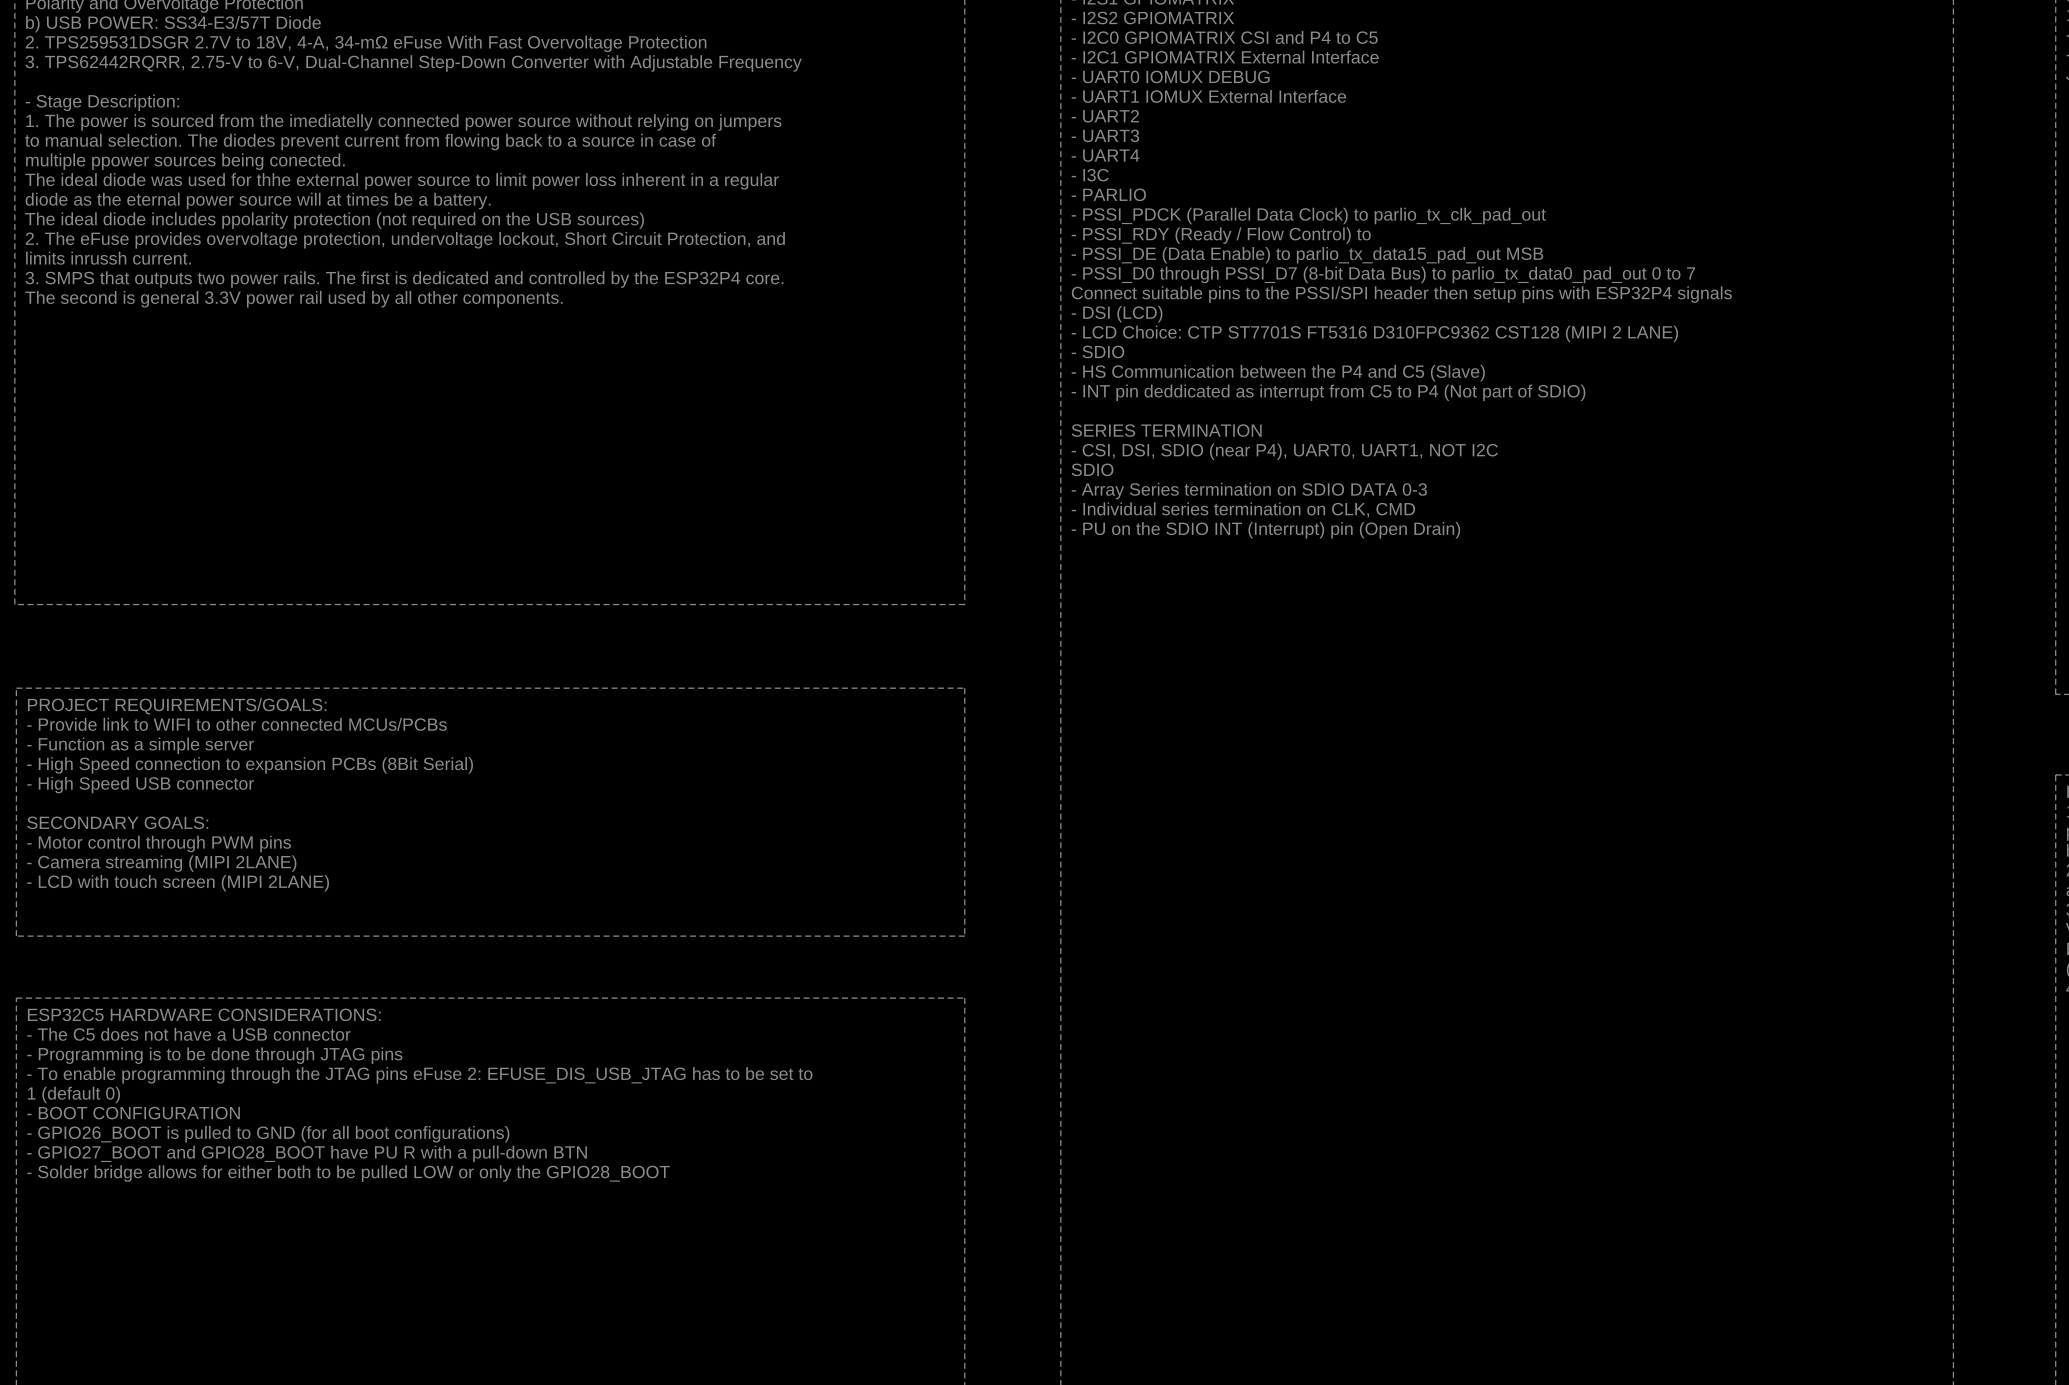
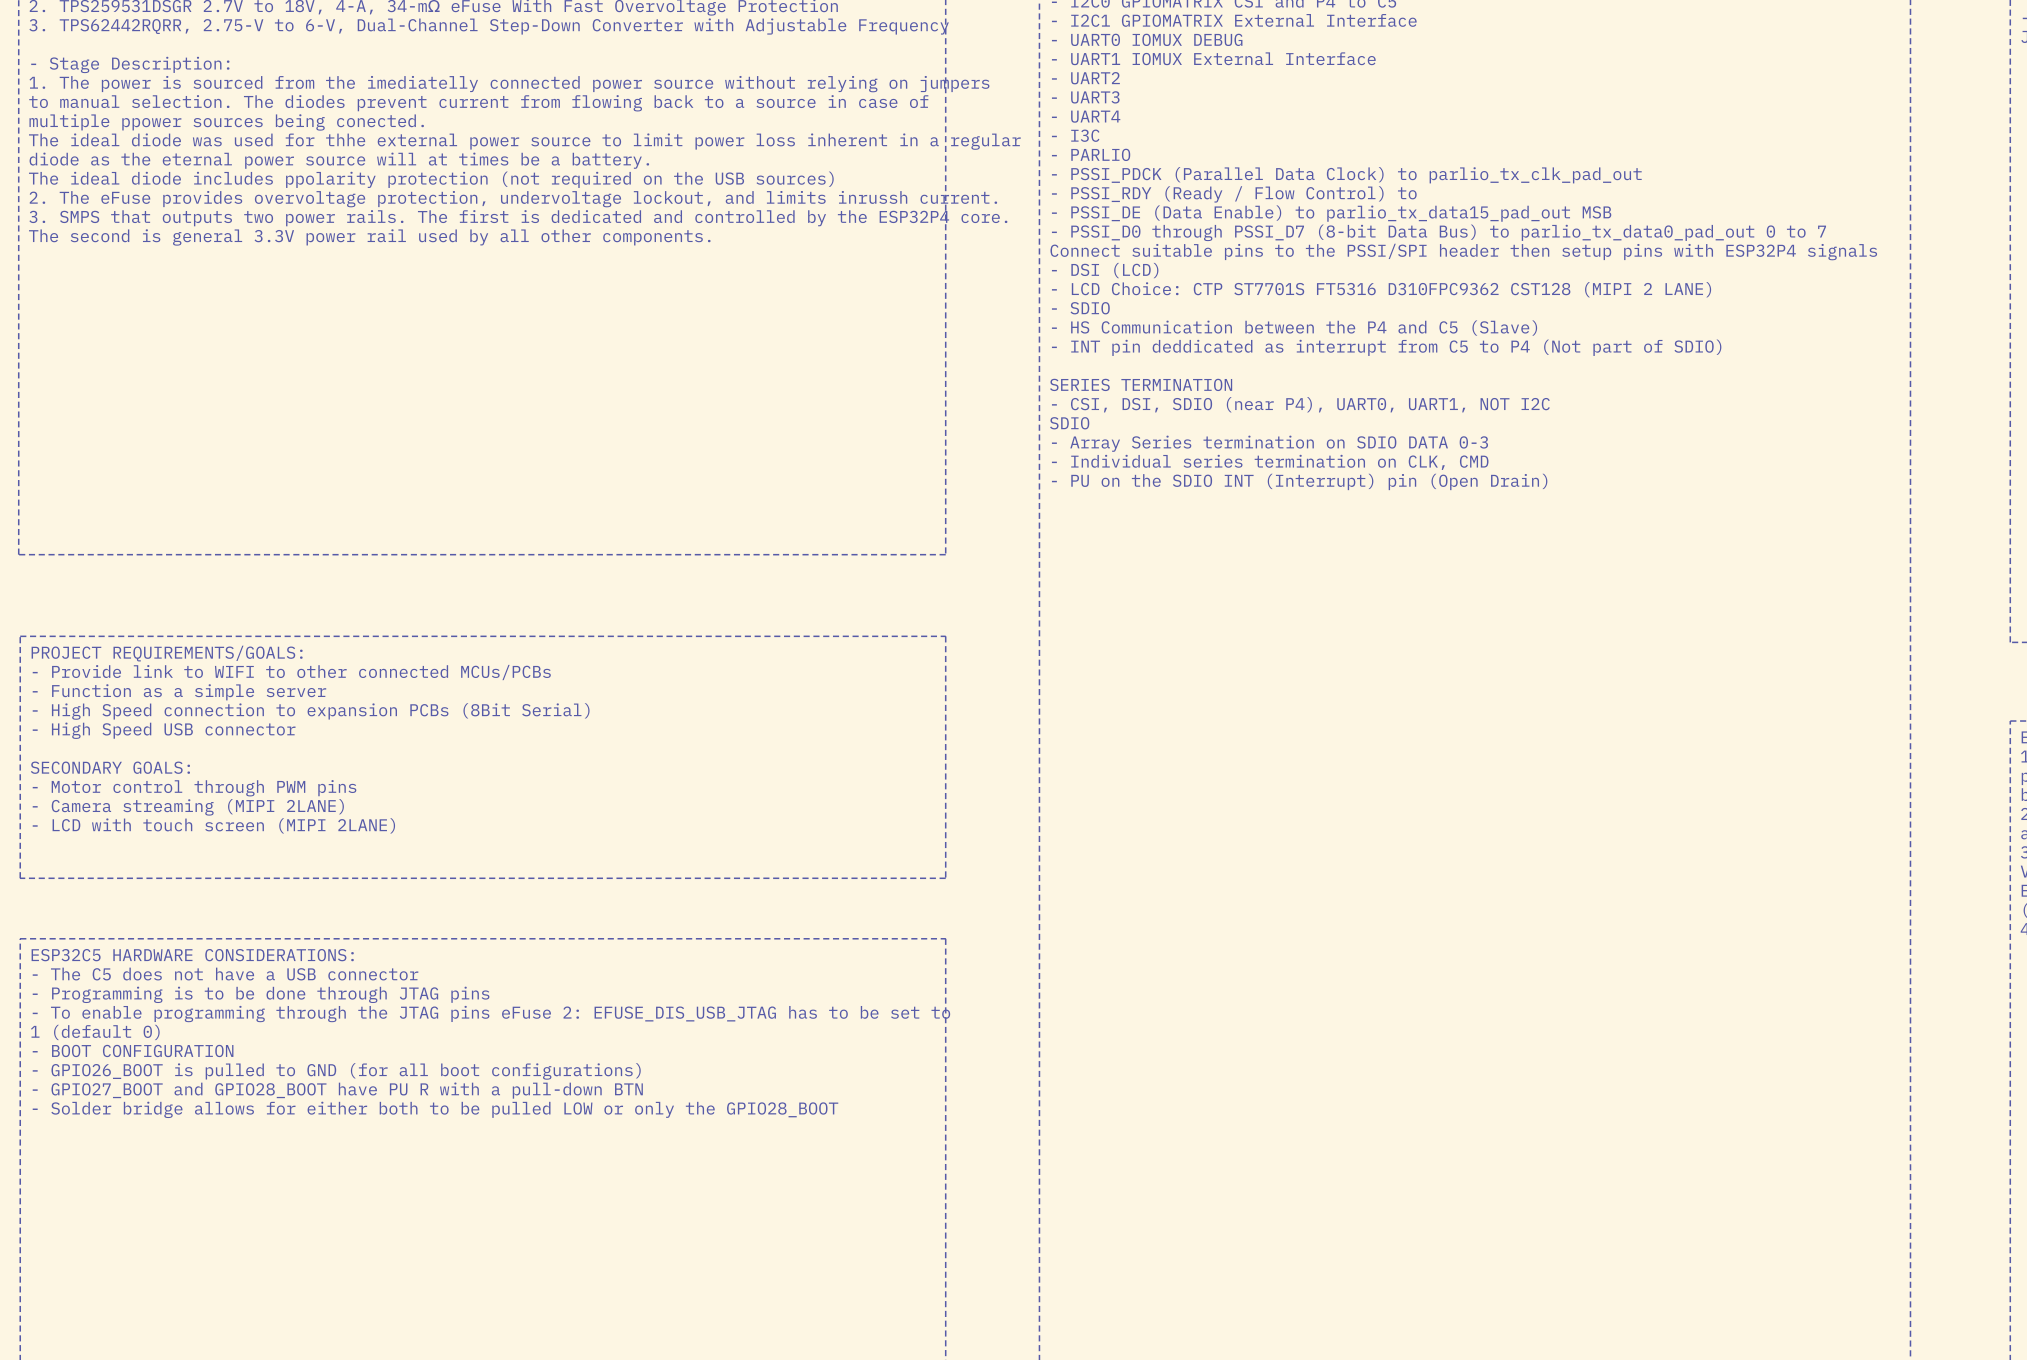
text: 2. The eFuse provides overvoltage protection, undervoltage lockout, Short Circuit Protection, and (405, 240) -> 2. The eFuse provides overvoltage protection, undervoltage lockout, and limits inrussh current. (513, 199)
text: limits inrussh current. (108, 258) -> 3. SMPS that outputs two power rails. The first is dedicated and controlled by the ESP32P4 core. (518, 218)
text: 3. SMPS that outputs two power rails. The first is dedicated and controlled by the ESP32P4 core. (404, 279) -> The second is general 3.3V power rail used by all other components. (369, 237)
text: The second is general 3.3V power rail used by all other components. (293, 299) -> none

